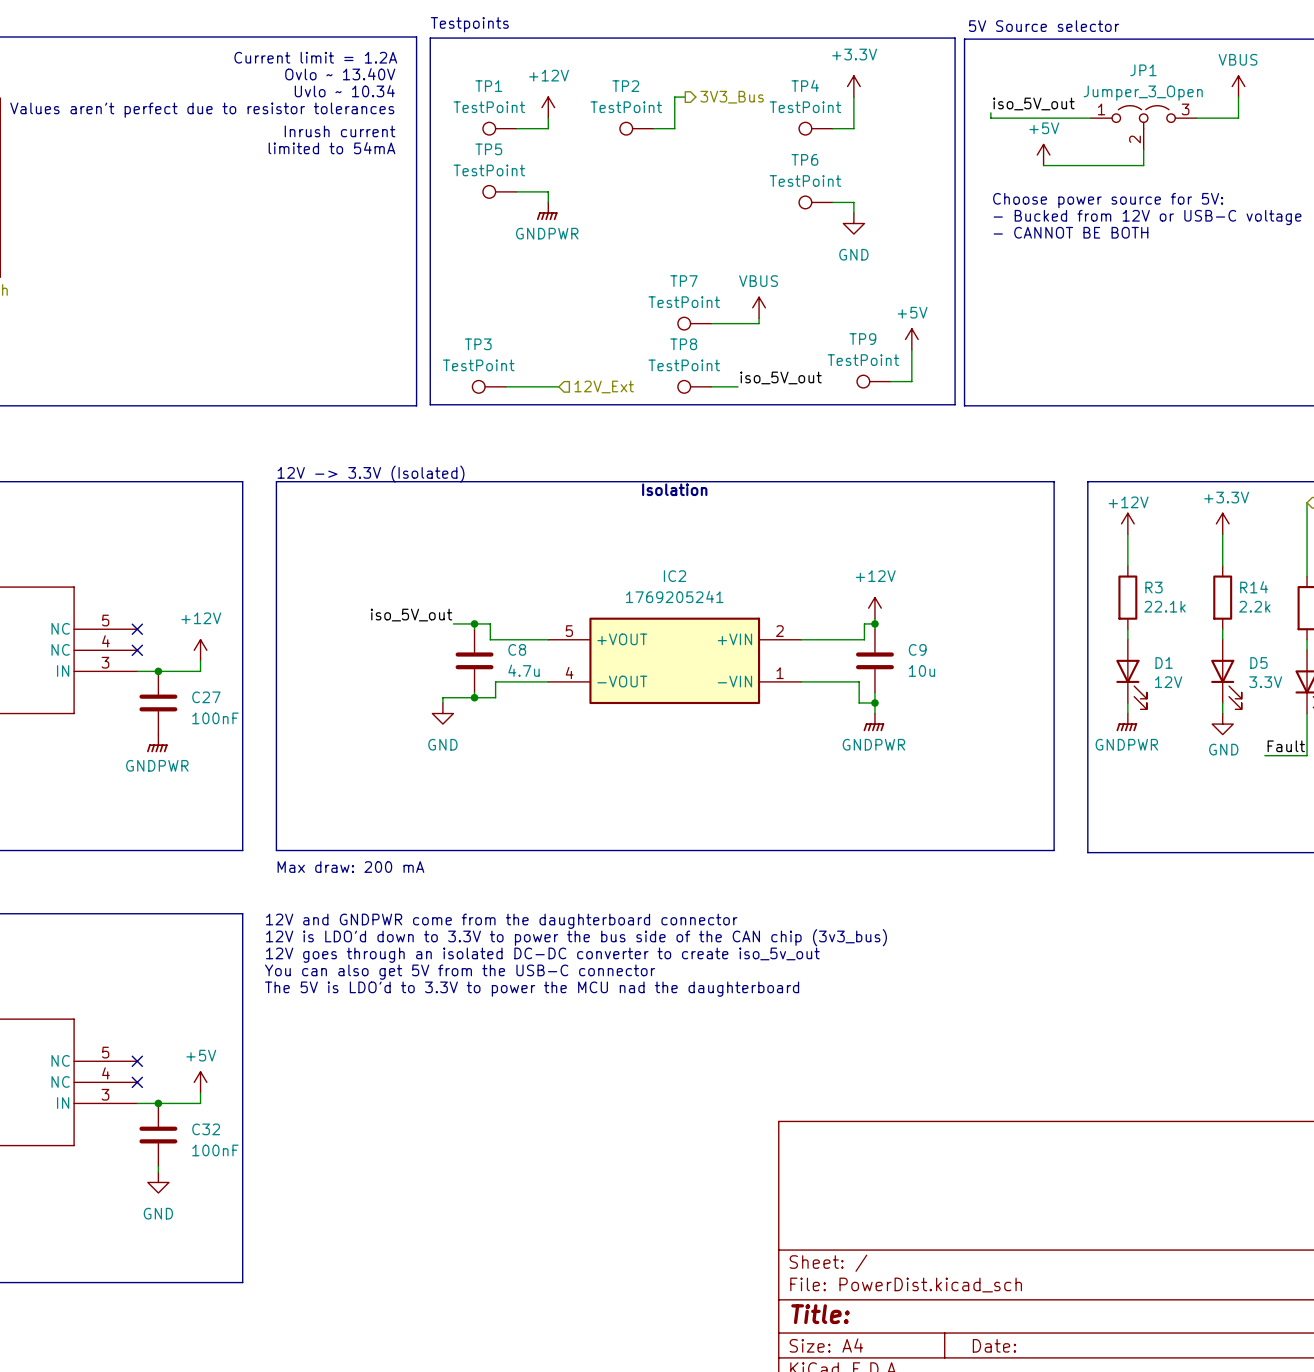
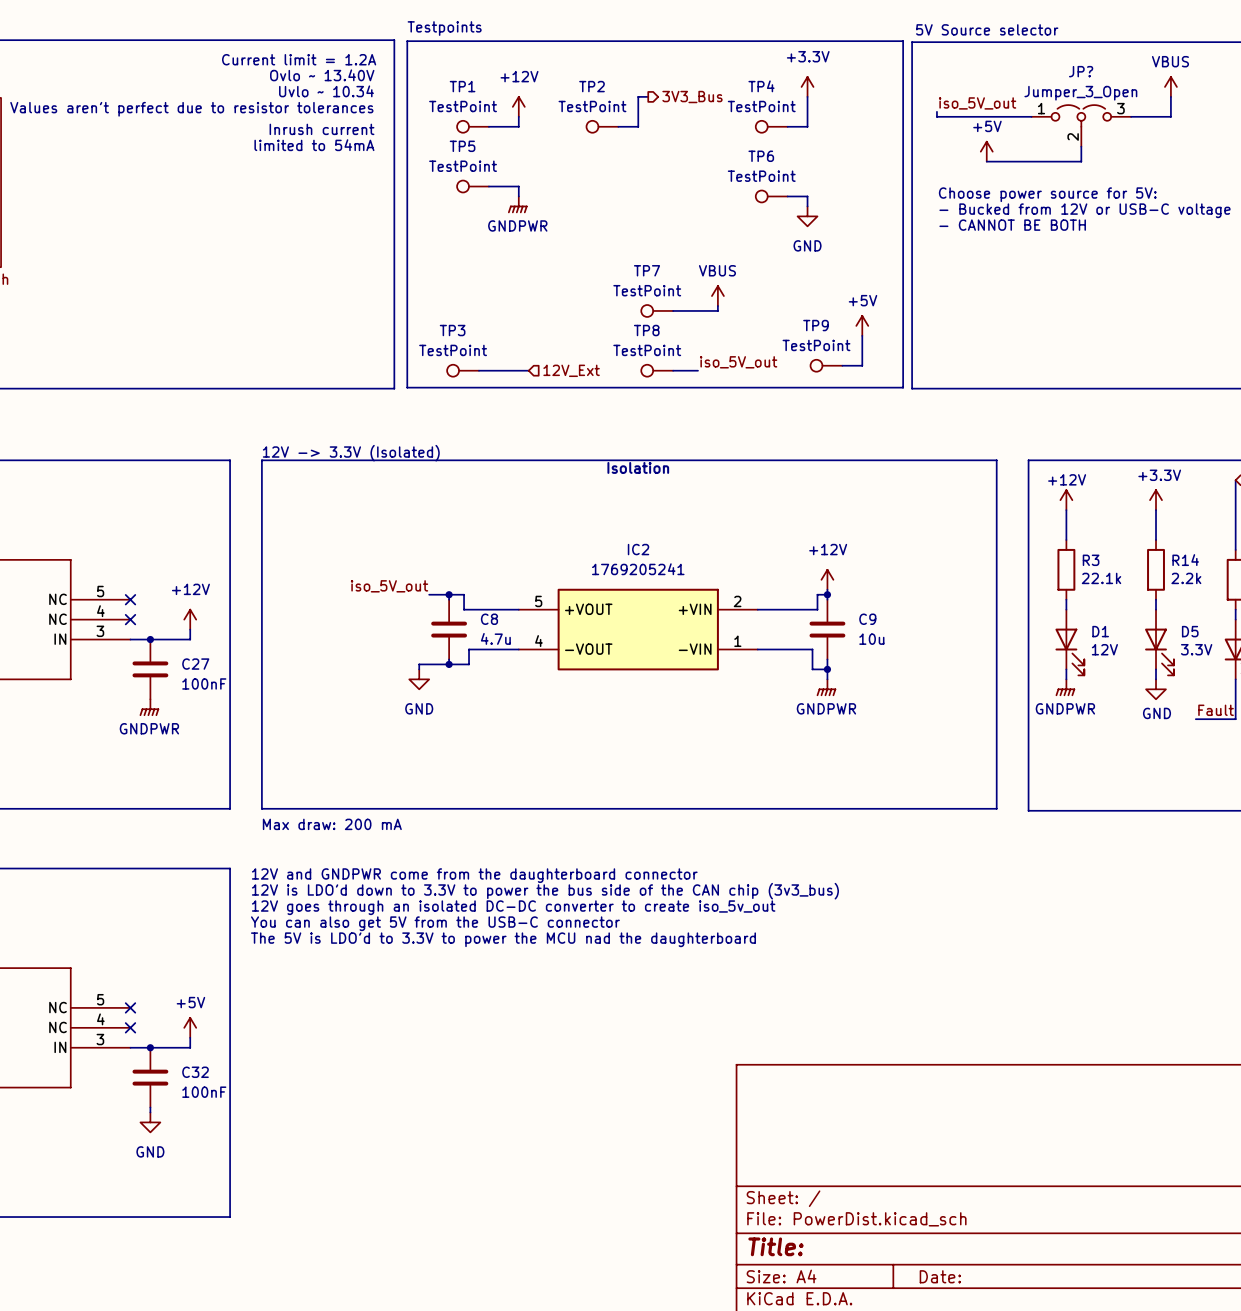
JP1 name: JP1 (1143, 70) -> JP? (1081, 71)

